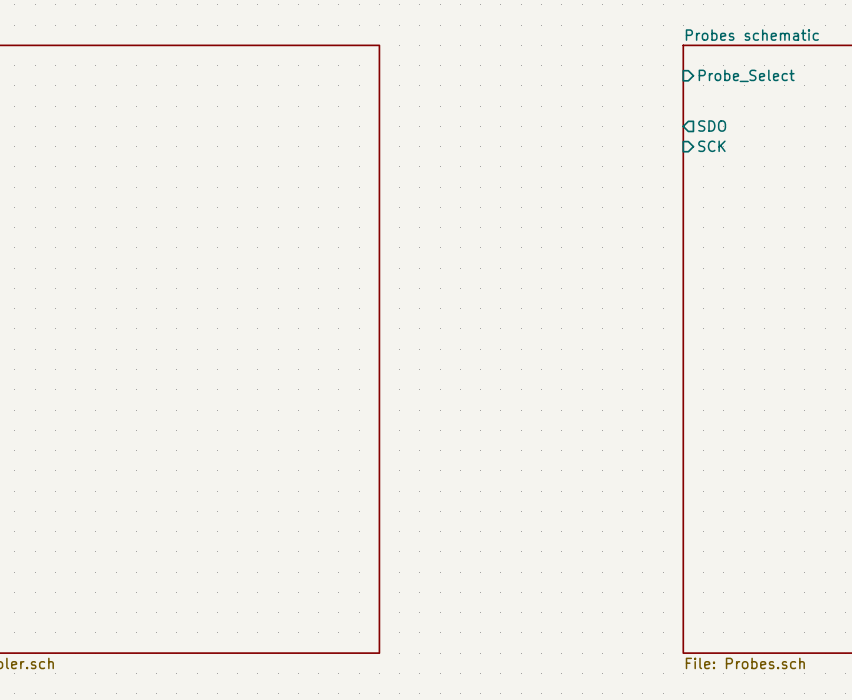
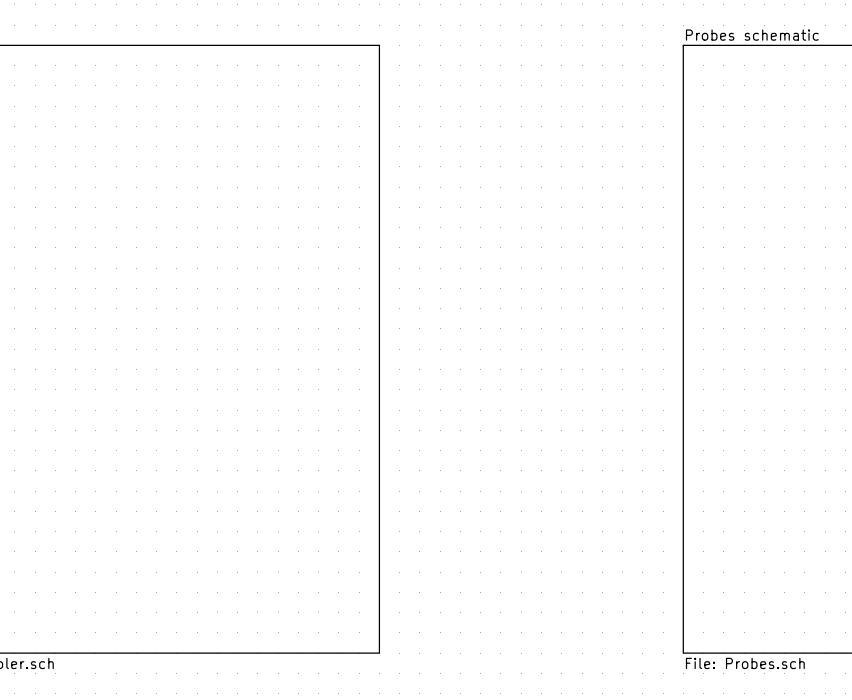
sheet pin: Probe_Select (746, 75) -> none
sheet pin: SDO (712, 126) -> none
sheet pin: SCK (711, 146) -> none

